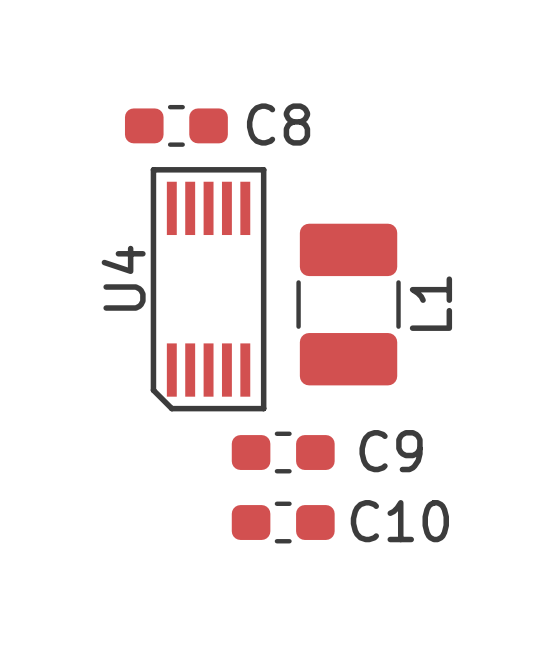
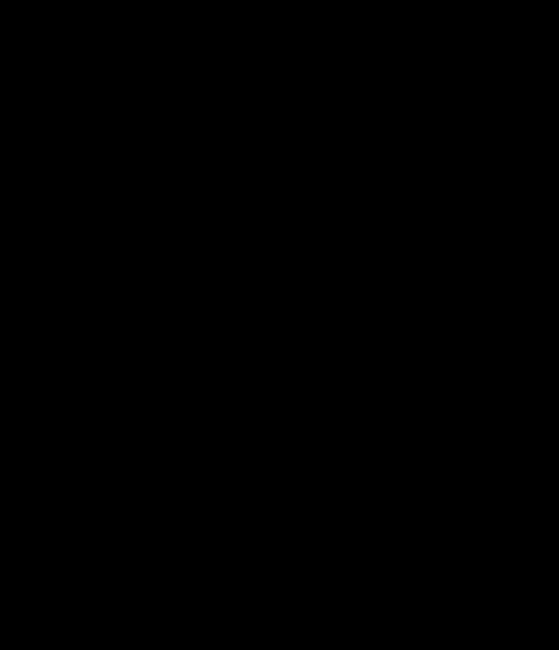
C8: (176, 125) -> none
U4: (208, 289) -> none
L1: (348, 304) -> none
C9: (283, 452) -> none
C10: (283, 522) -> none

